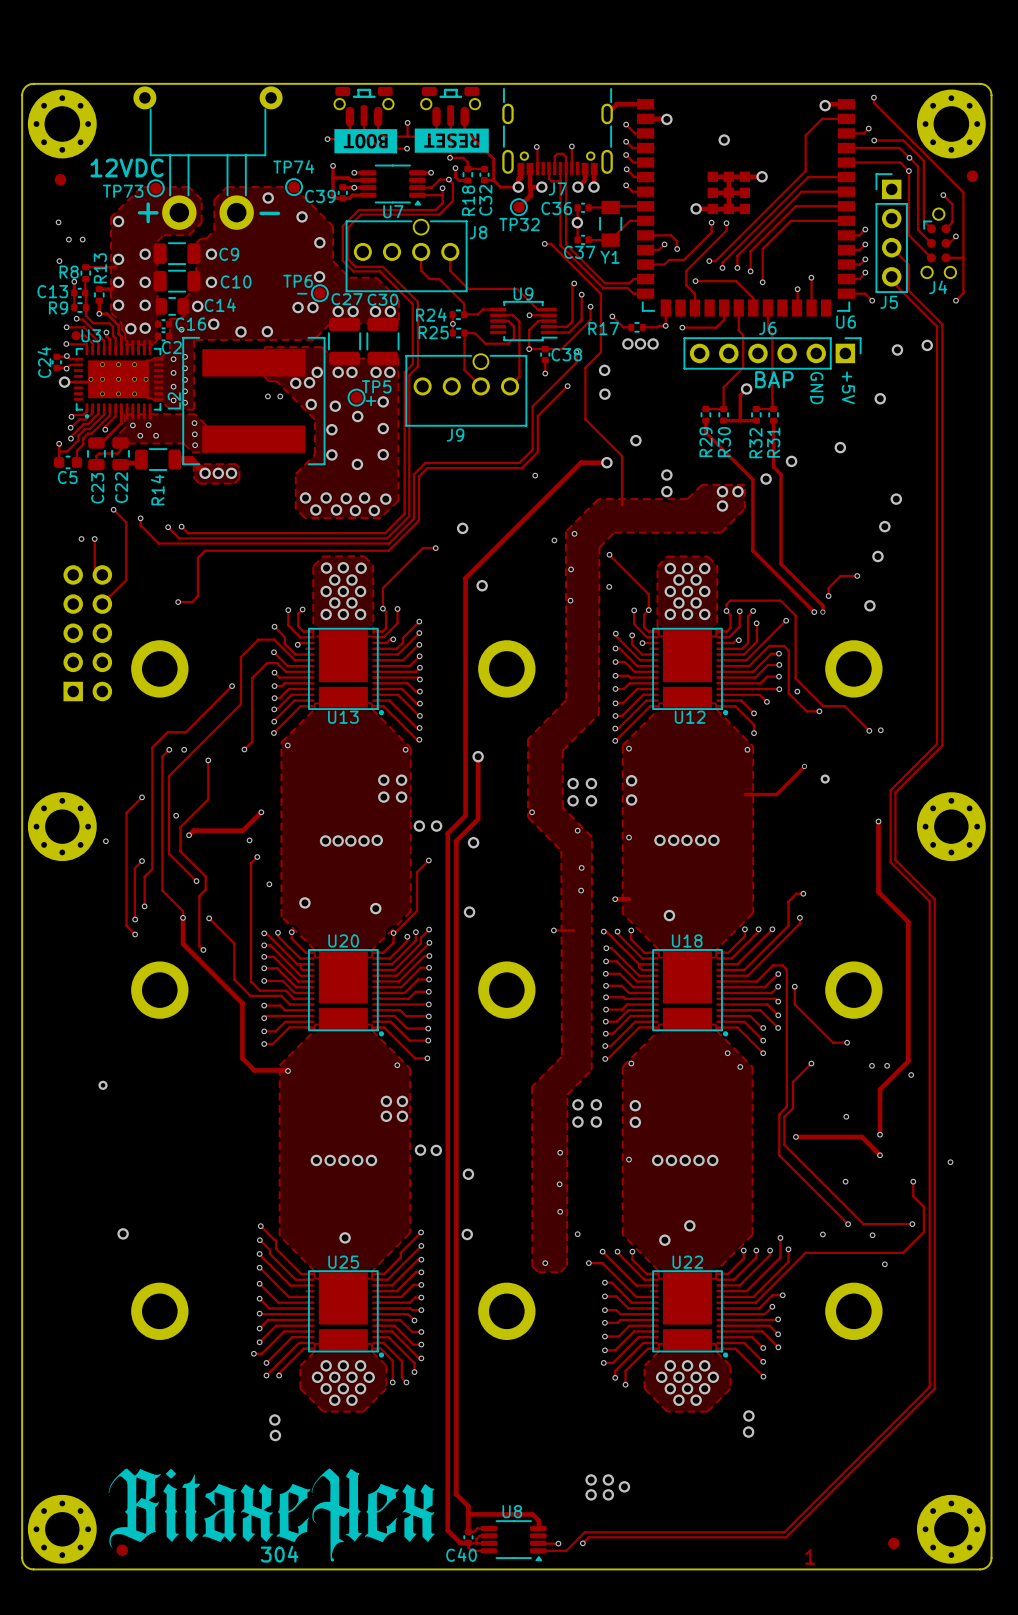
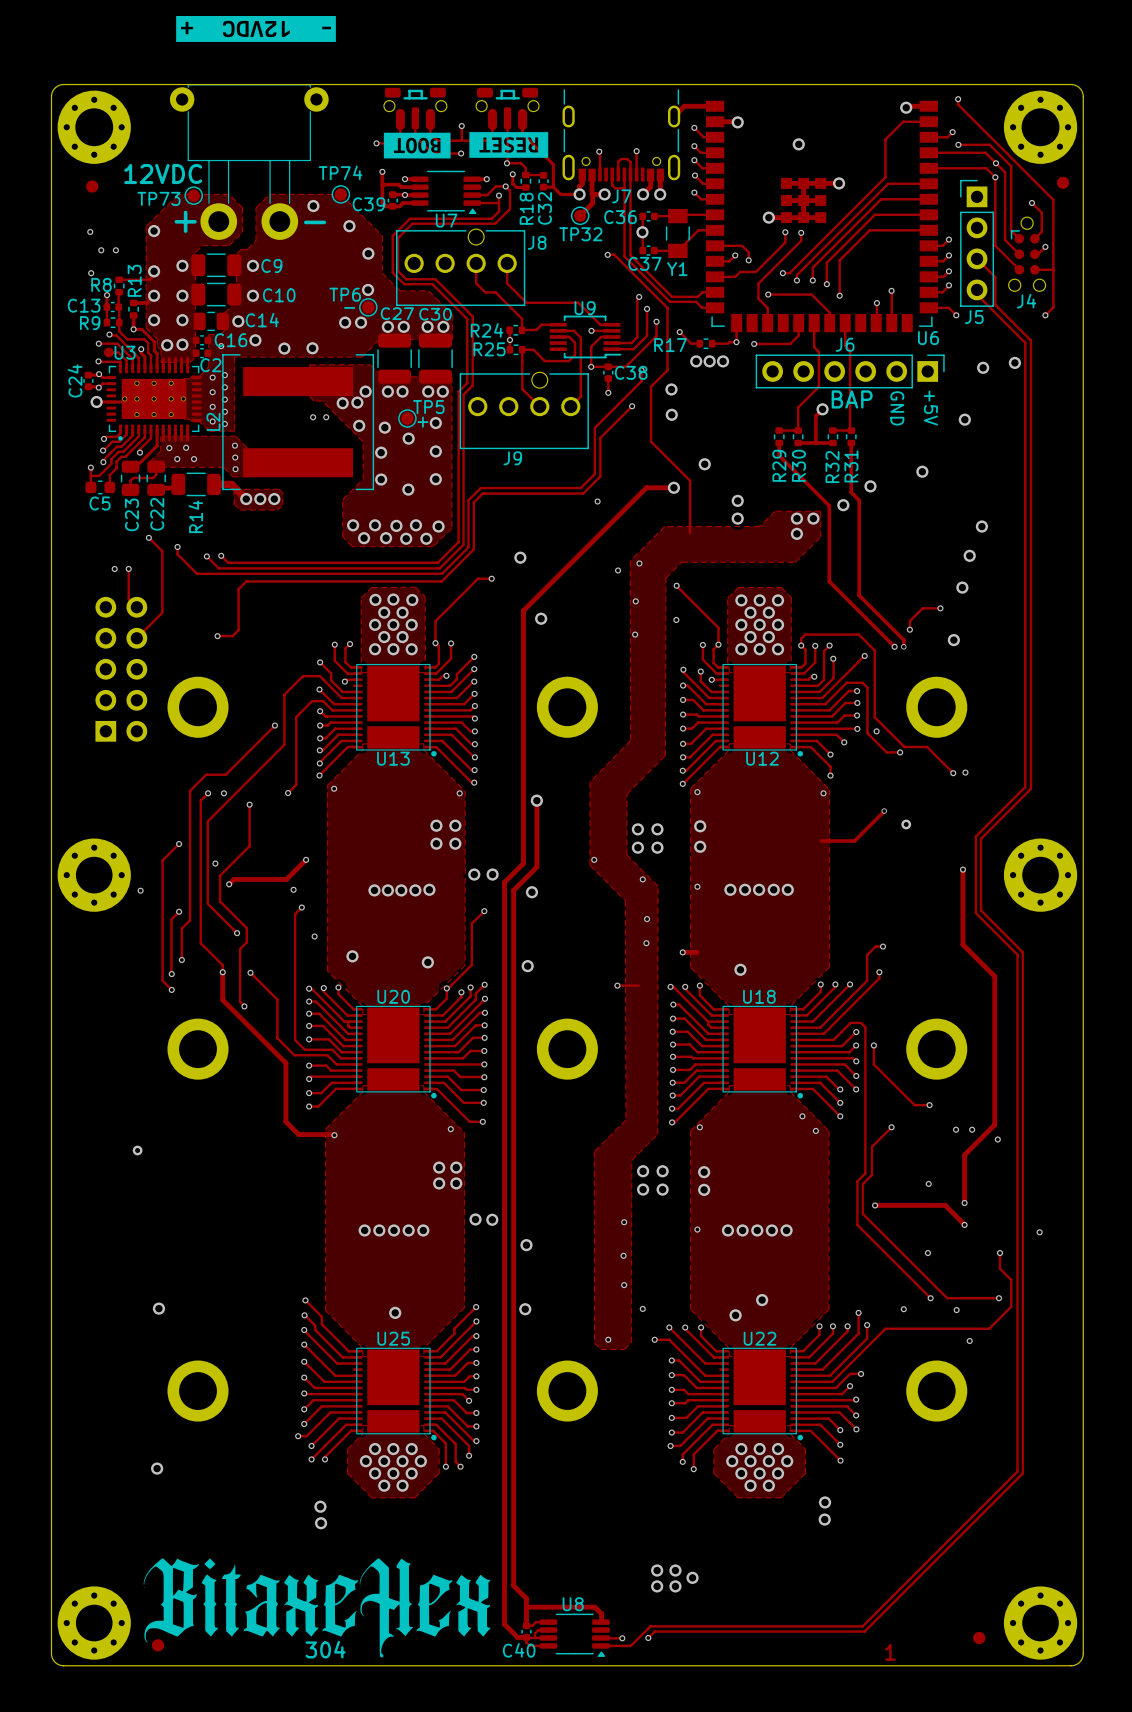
drawing: none -> [176, 15, 336, 42]
part footprint: [133, 86, 283, 230] -> [169, 84, 329, 240]
via: none -> (157, 1468)

